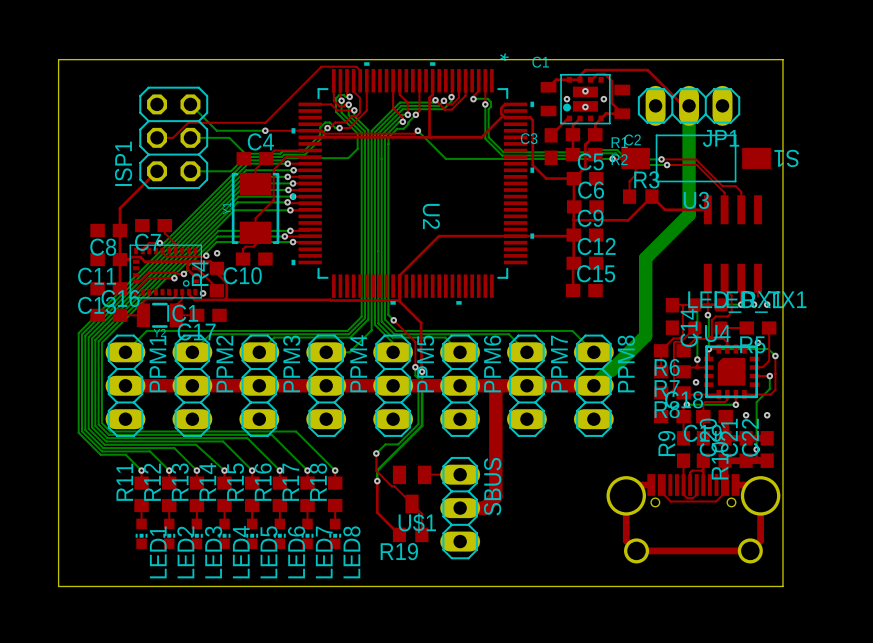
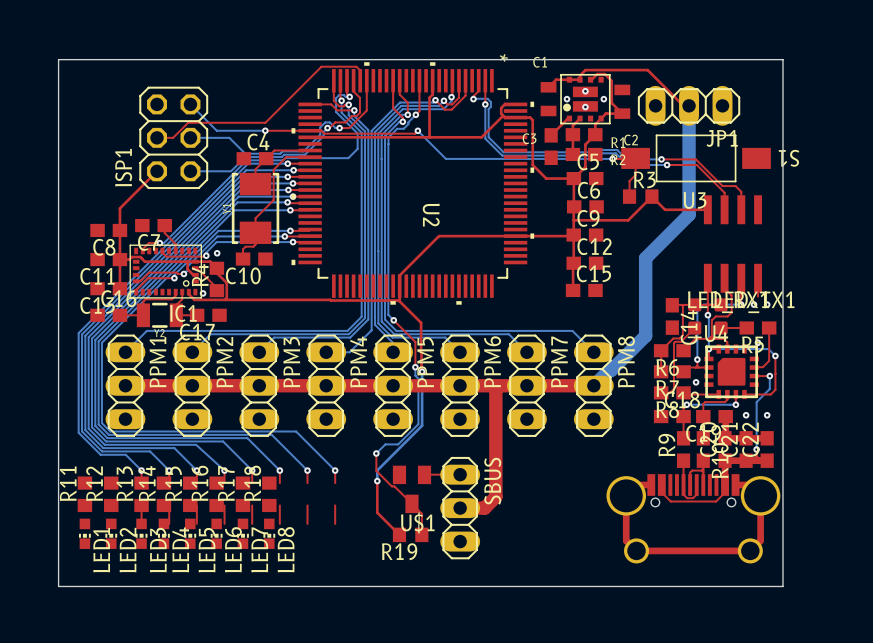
R11 name: R11 (124, 482) -> R13 (124, 483)
R11: none -> (84, 494)
R12 position: (169, 494) -> (111, 494)
R13: (196, 494) -> none
R14 position: (224, 494) -> (163, 494)
R15 position: (252, 494) -> (190, 494)
R16 position: (279, 494) -> (216, 494)
R17 position: (307, 494) -> (242, 494)
R18 position: (335, 494) -> (269, 494)
LED1: none -> (84, 533)
LED2 position: (169, 533) -> (111, 533)
LED3: (196, 533) -> none
LED4 position: (224, 533) -> (163, 533)
LED5 position: (252, 533) -> (190, 533)
LED6 position: (279, 533) -> (216, 533)
LED7 position: (307, 533) -> (242, 533)
LED8 position: (335, 533) -> (269, 533)
LED1 name: LED1 (158, 552) -> LED3 (158, 550)

